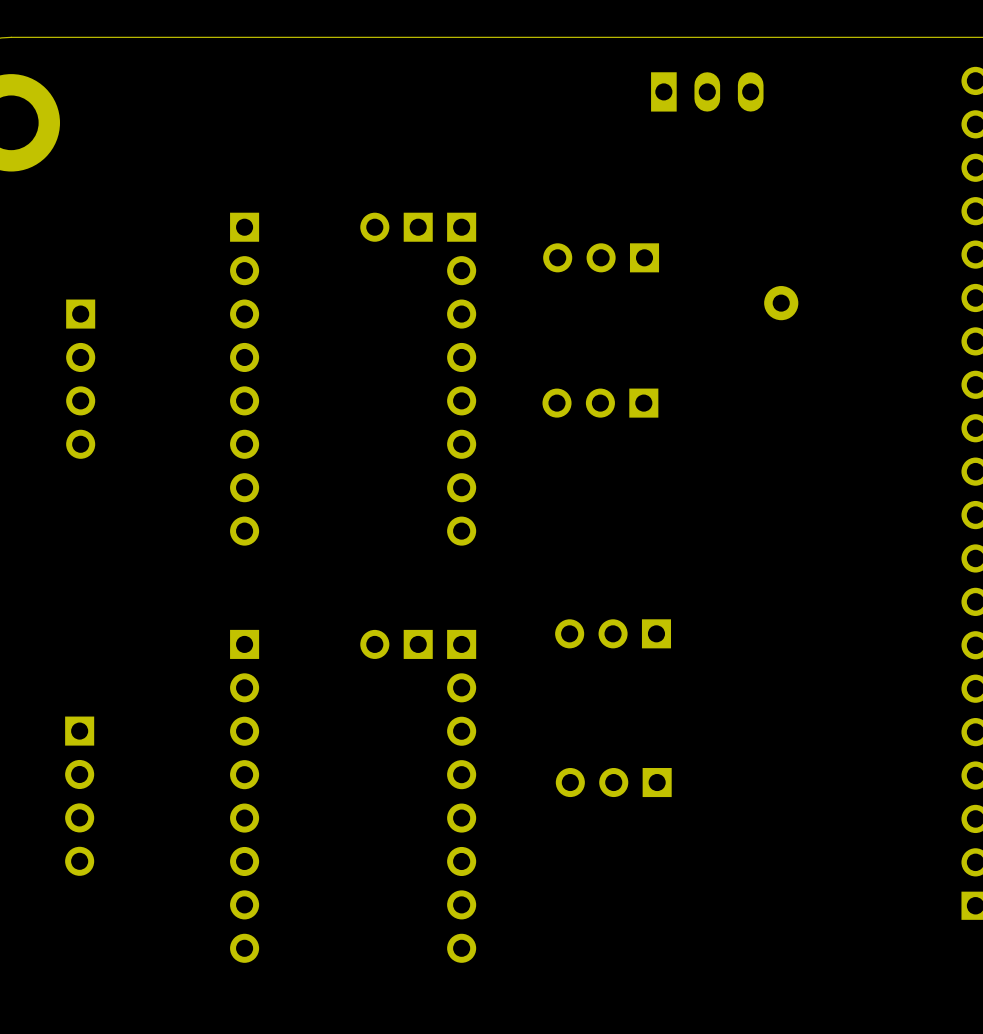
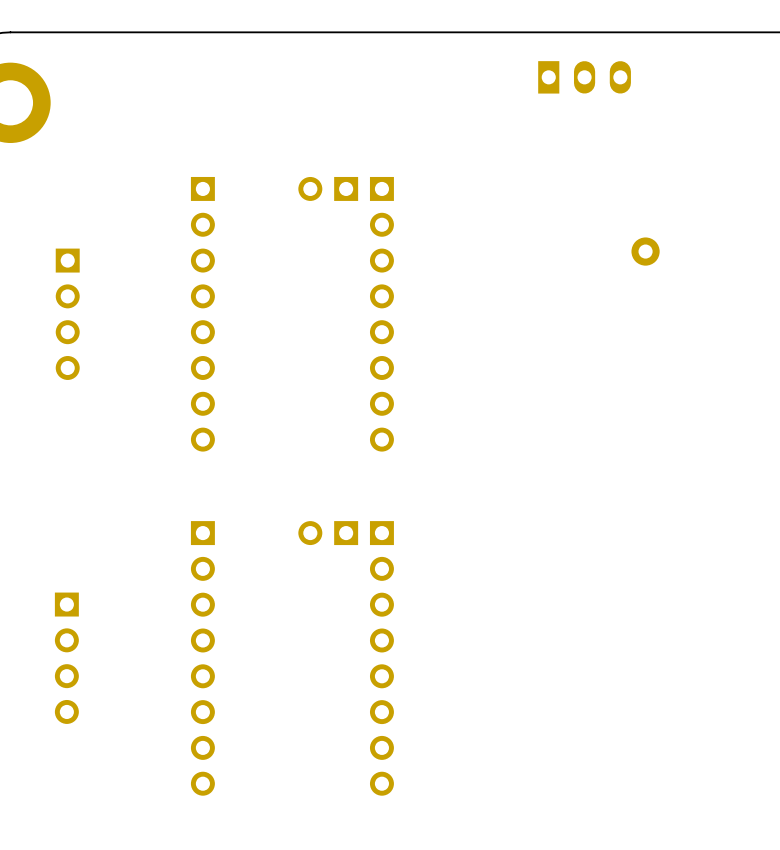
part: (601, 257) -> none
part: (600, 403) -> none
part: (613, 633) -> none
part: (613, 782) -> none

